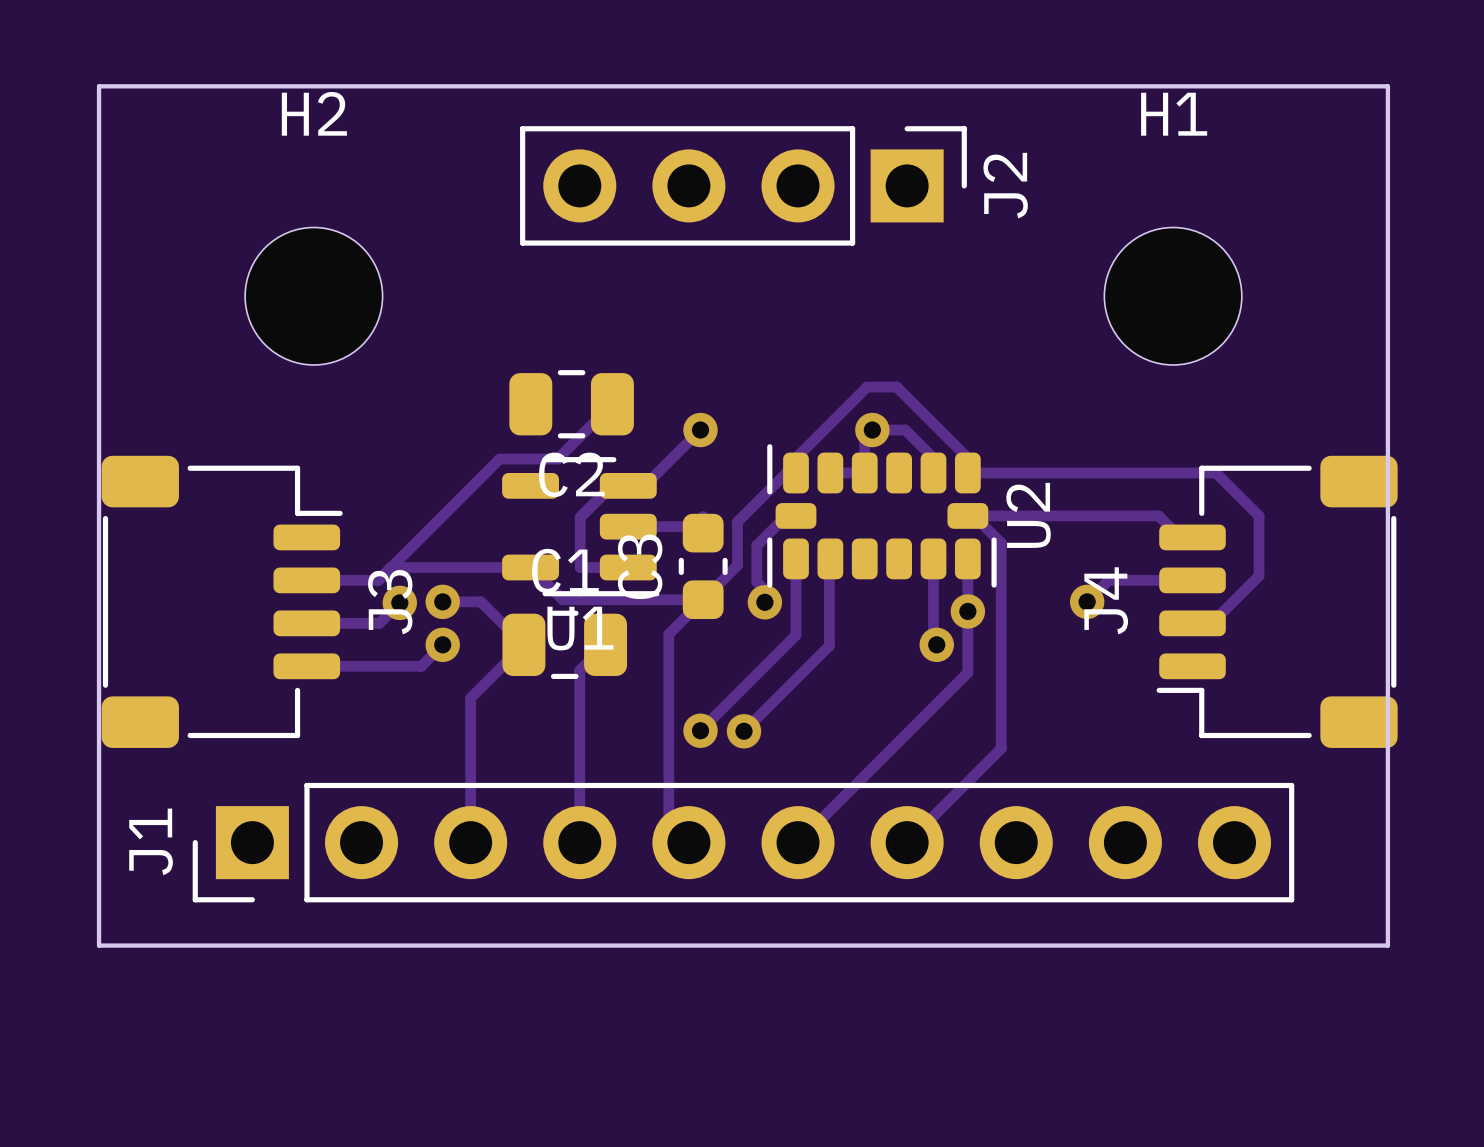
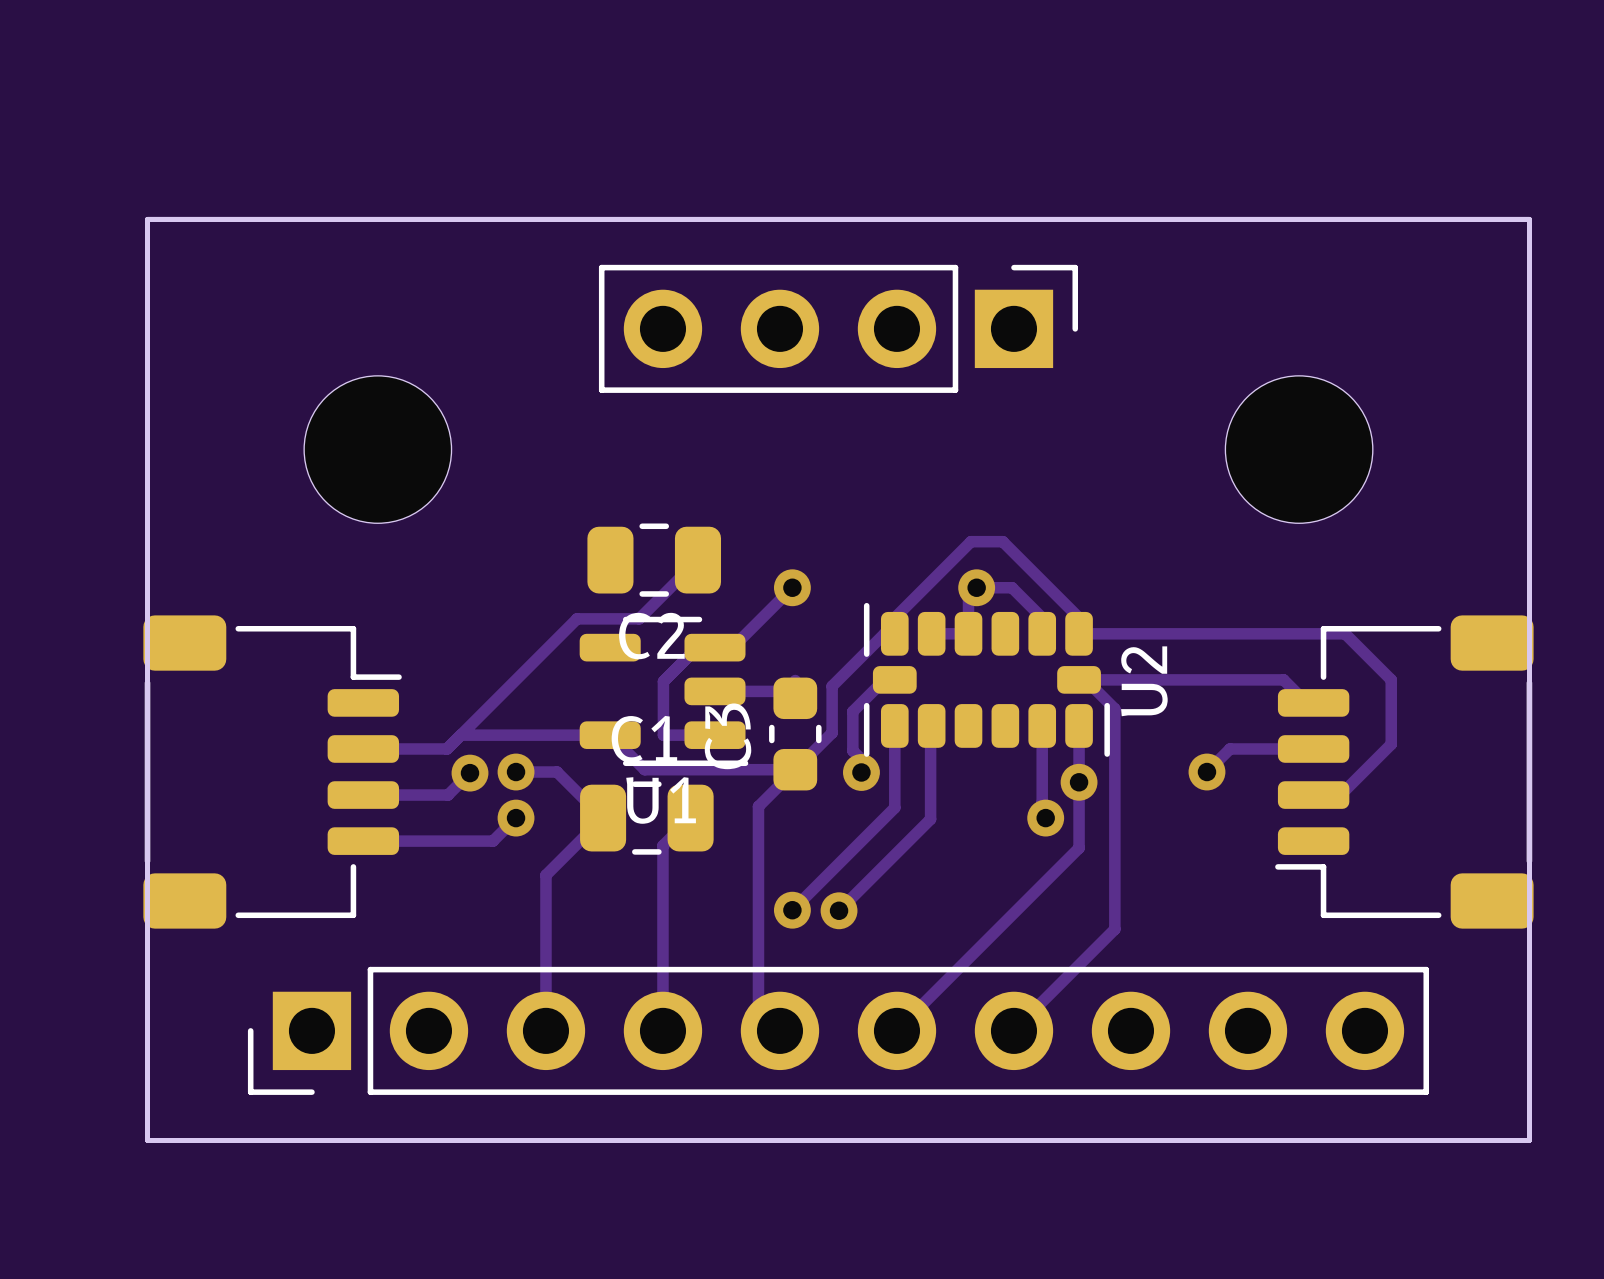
J2: (743, 185) -> none
H2: (313, 296) -> none
H1: (1173, 296) -> none
part: none -> (838, 679)
J3: (222, 601) -> none
J4: (1277, 601) -> none
J1: (743, 842) -> none

